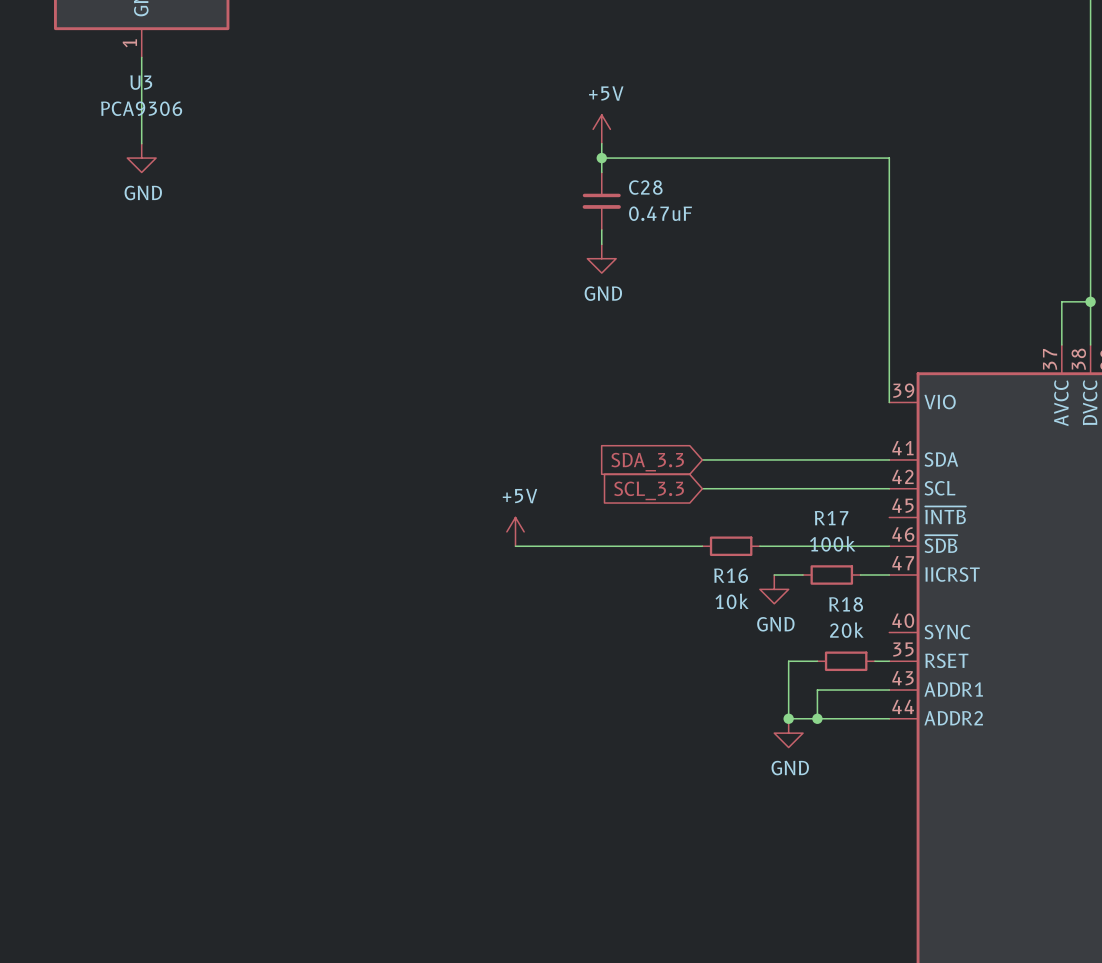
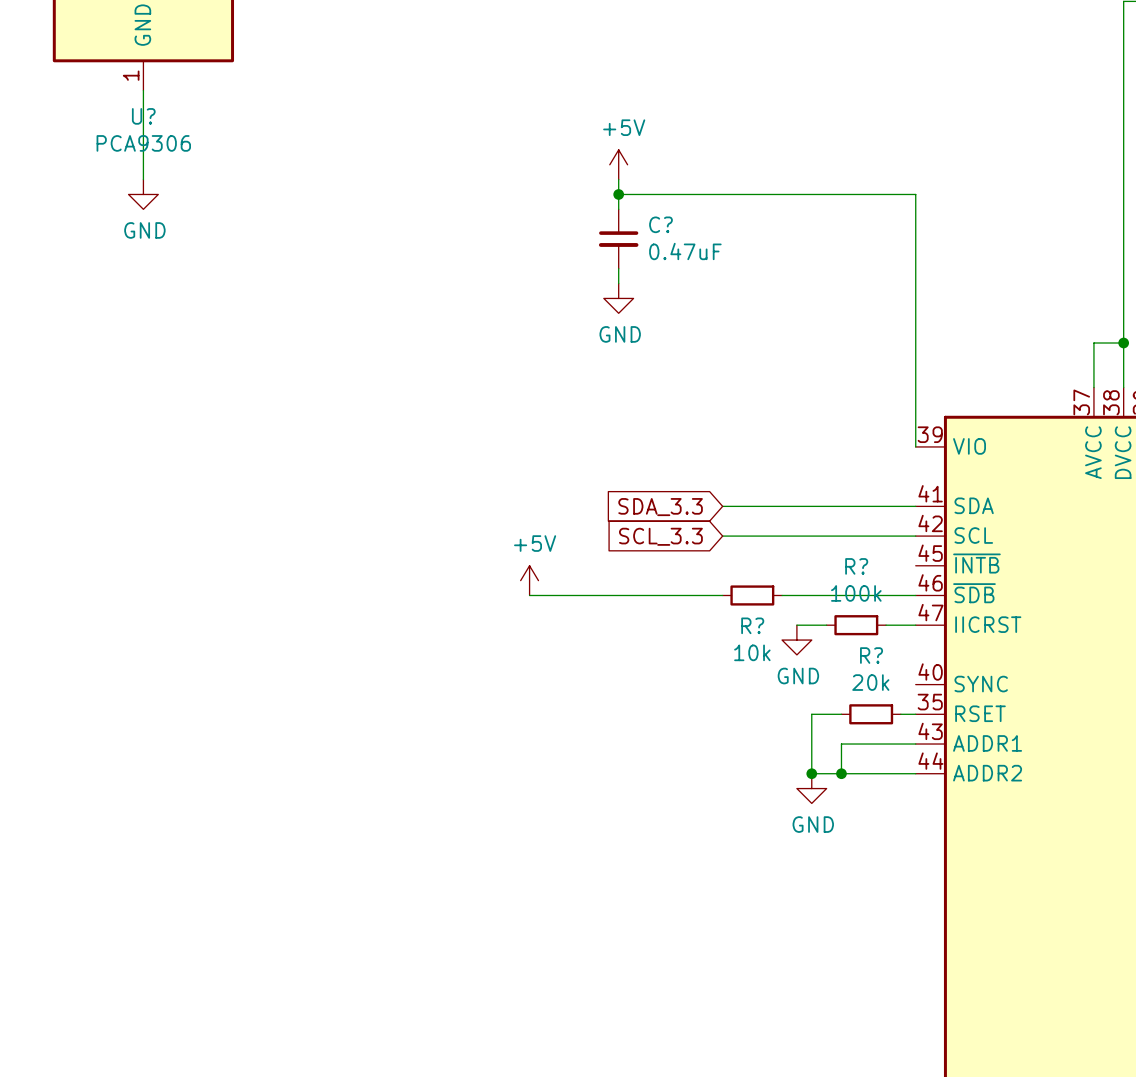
U3 name: U3 (141, 82) -> U? (143, 116)
C28 name: C28 (645, 187) -> C? (660, 224)
R17 name: R17 (831, 518) -> R? (856, 566)
R16 name: R16 (731, 575) -> R? (752, 625)
R18 name: R18 (846, 604) -> R? (871, 655)

